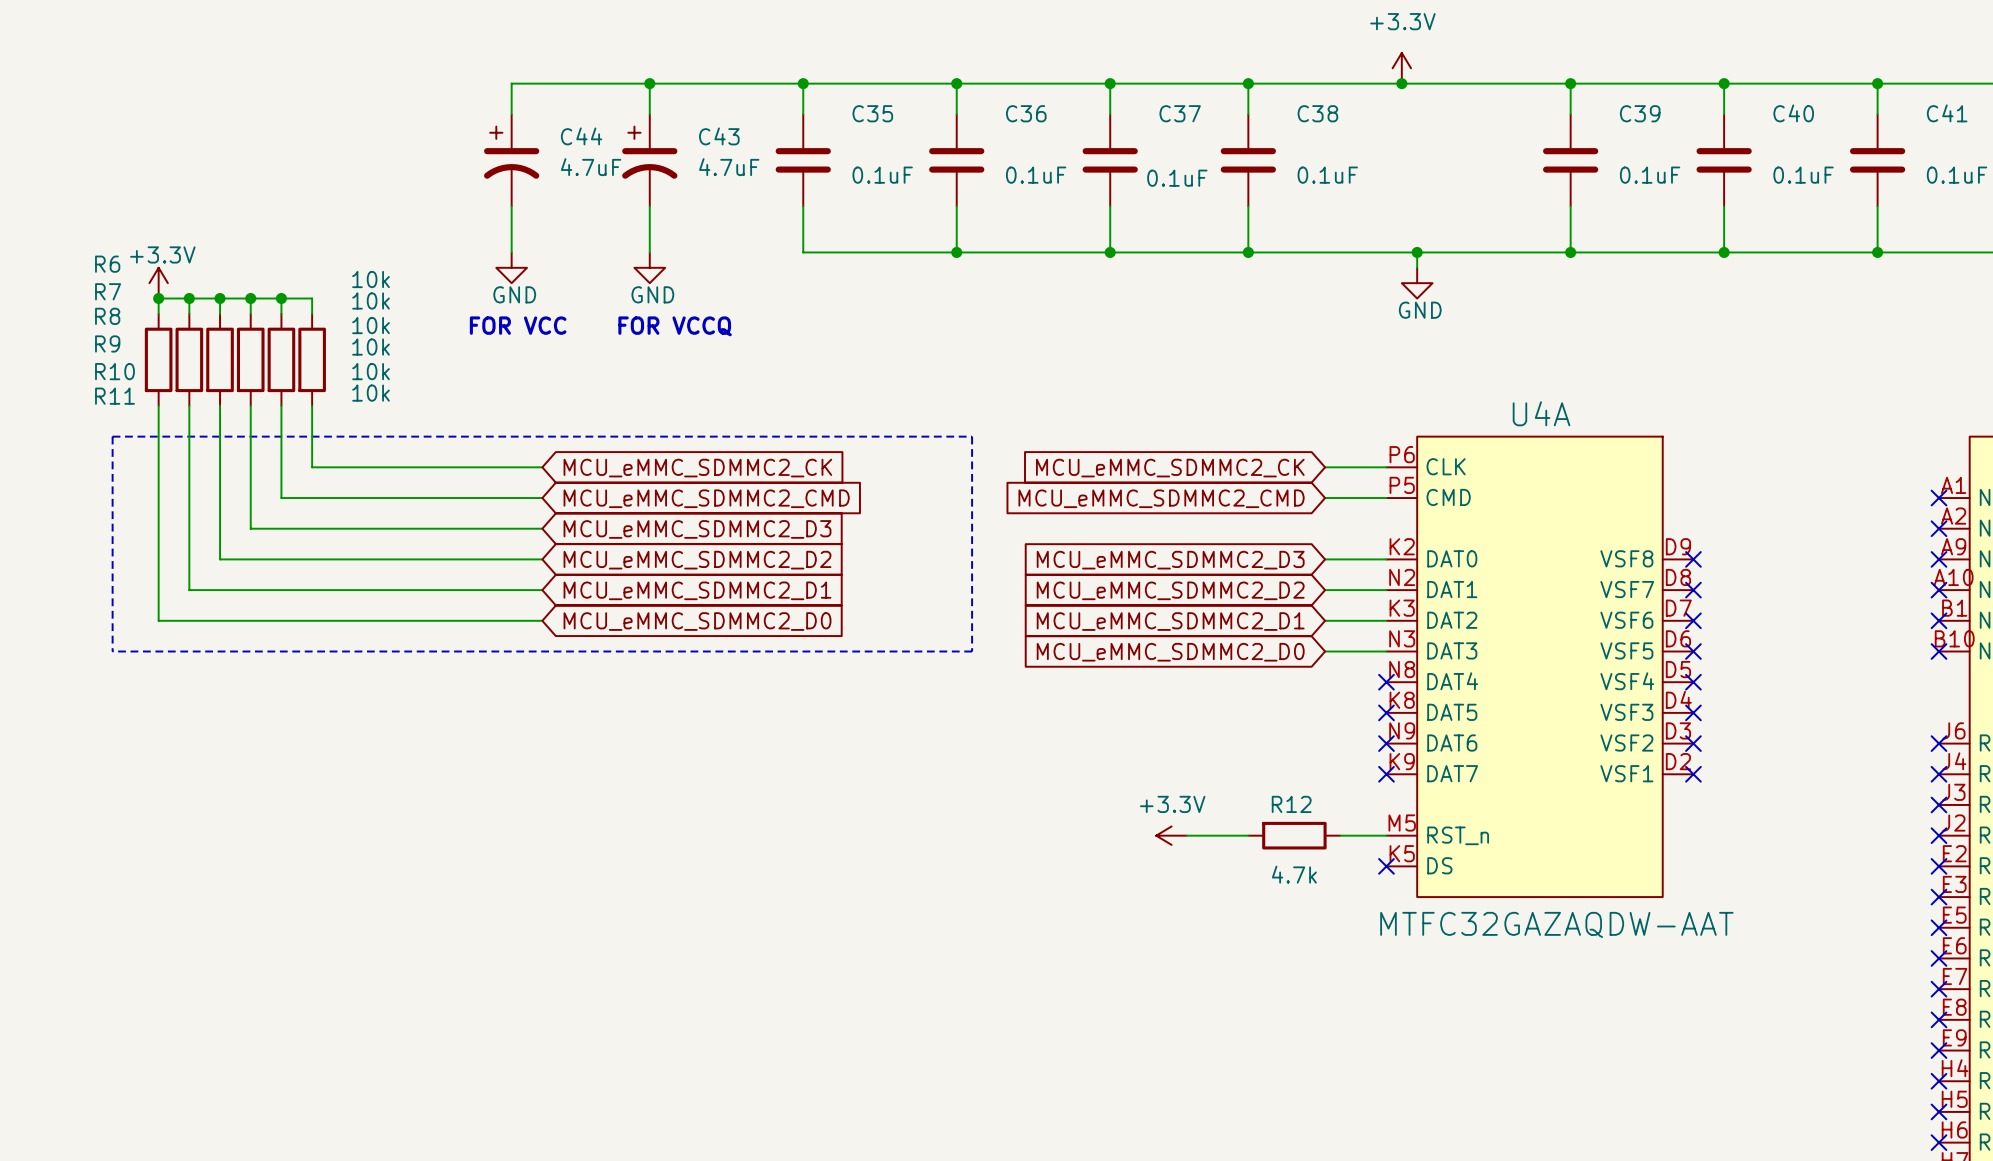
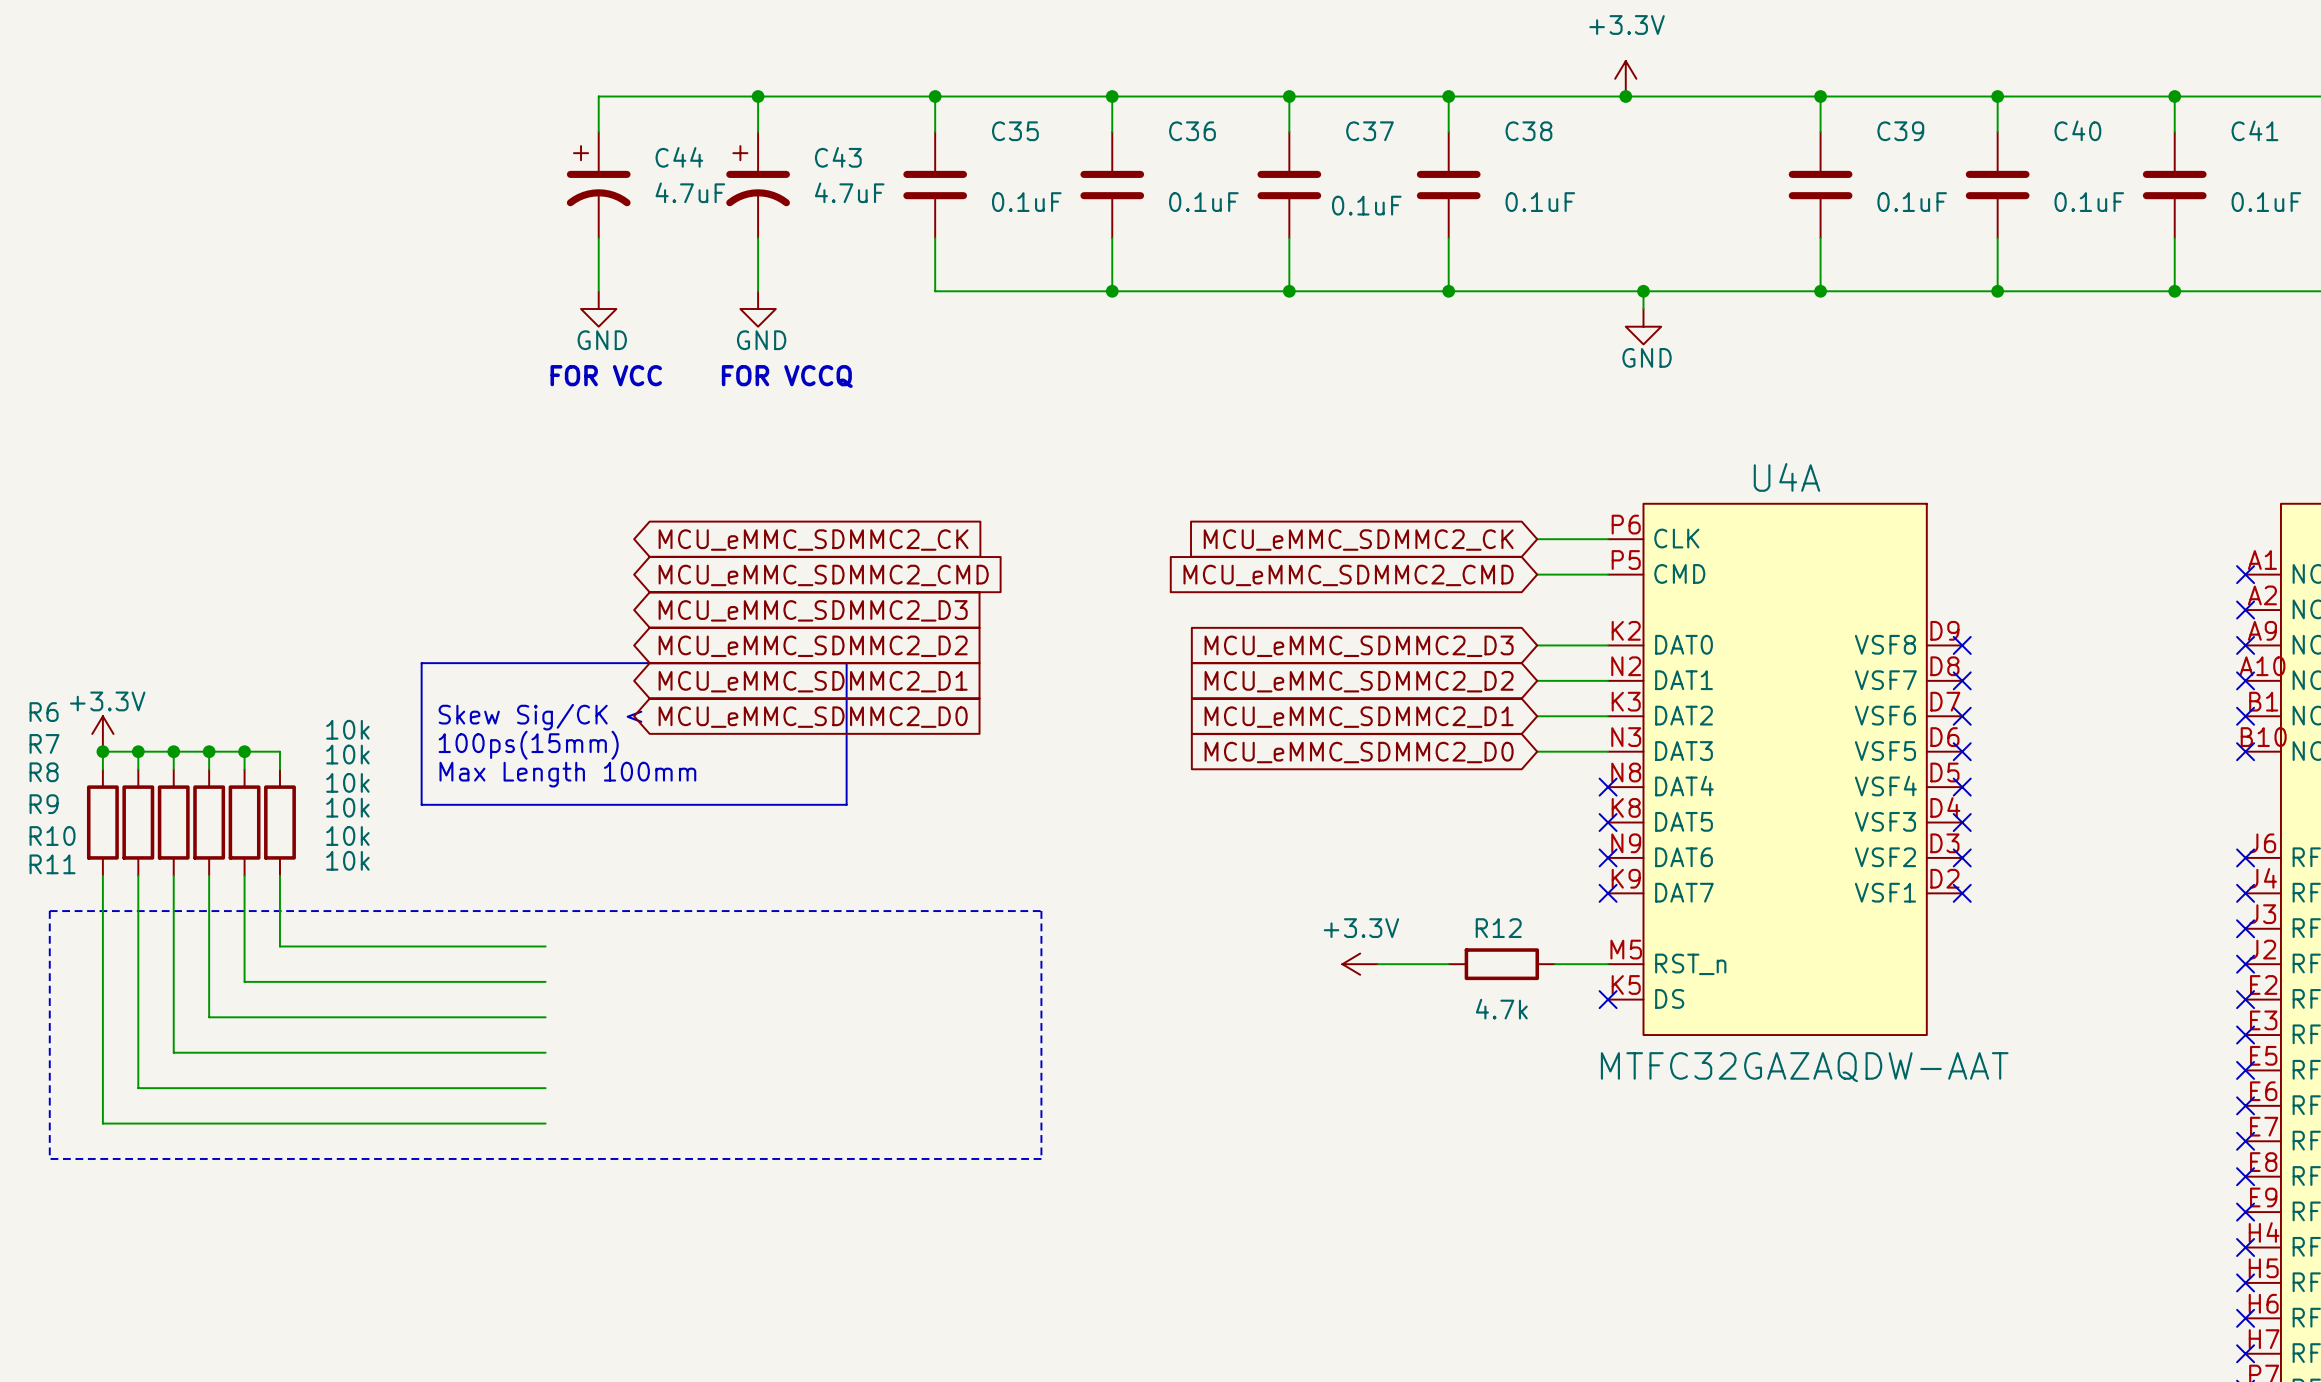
power symbol: +3.3V (158, 283) -> none
junction: (158, 298) -> none
wire: (189, 298) (189, 313) -> none
junction: (189, 298) -> none
wire: (220, 298) (220, 313) -> none
junction: (220, 298) -> none
wire: (250, 298) (250, 313) -> none
junction: (250, 298) -> none
wire: (281, 298) (281, 313) -> none
junction: (281, 298) -> none
wire: (158, 313) (158, 298) (312, 298) (312, 313) -> none
R6 position: (158, 359) -> (102, 822)
R7 position: (189, 359) -> (138, 822)
R8 position: (220, 359) -> (173, 822)
R9 position: (250, 359) -> (209, 822)
R10 position: (281, 359) -> (244, 822)
R11 position: (312, 359) -> (279, 822)
wire: (158, 405) (158, 620) (542, 620) -> none
wire: (189, 405) (189, 590) (542, 590) -> none
wire: (220, 405) (220, 559) (542, 559) -> none
wire: (250, 405) (250, 528) (542, 528) -> none
wire: (281, 405) (281, 498) (542, 498) -> none
wire: (312, 405) (312, 467) (542, 467) -> none
line: (112, 436) (972, 436) (972, 651) (112, 651) (112, 436) -> none
line: none -> (421, 663) (846, 663) (846, 804) (421, 804) (421, 663)
text: none -> Skew Sig/CK < (540, 717)
power symbol: none -> +3.3V (102, 733)
text: none -> 100ps(15mm) (528, 745)
junction: none -> (102, 751)
wire: none -> (138, 751) (138, 769)
junction: none -> (138, 751)
wire: none -> (173, 751) (173, 769)
junction: none -> (173, 751)
wire: none -> (209, 751) (209, 769)
junction: none -> (209, 751)
wire: none -> (244, 751) (244, 769)
junction: none -> (244, 751)
wire: none -> (102, 769) (102, 751) (279, 751) (279, 769)
text: none -> Max Length 100mm (567, 774)
wire: none -> (102, 875) (102, 1123) (545, 1123)
wire: none -> (138, 875) (138, 1088) (545, 1088)
wire: none -> (173, 875) (173, 1052) (545, 1052)
wire: none -> (209, 875) (209, 1017) (545, 1017)
wire: none -> (244, 875) (244, 981) (545, 981)
wire: none -> (279, 875) (279, 946) (545, 946)
line: none -> (49, 911) (1041, 911) (1041, 1158) (49, 1158) (49, 911)

